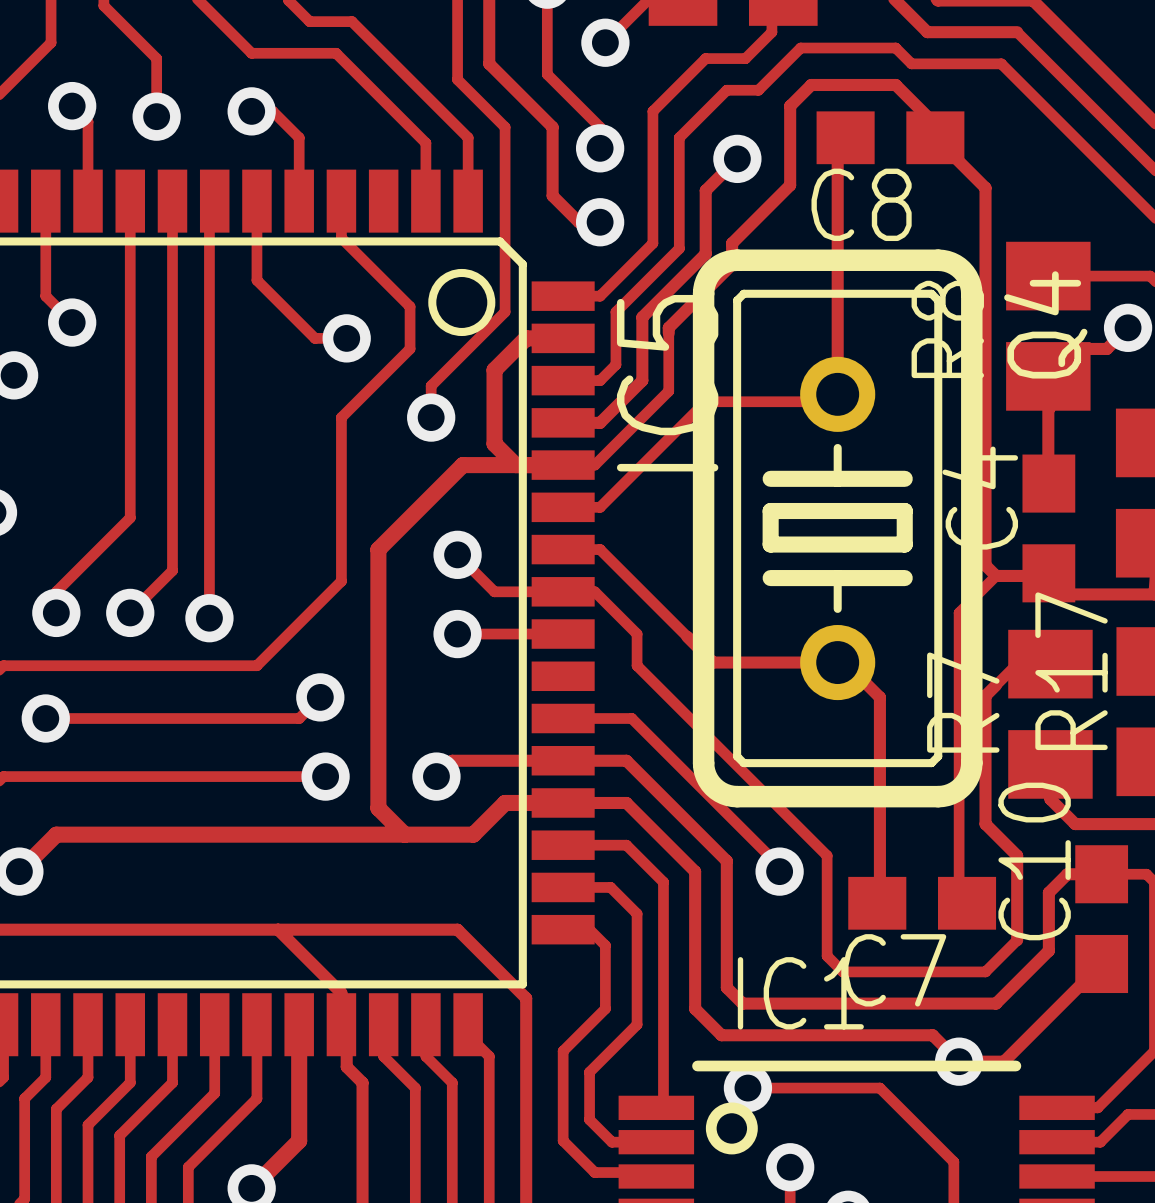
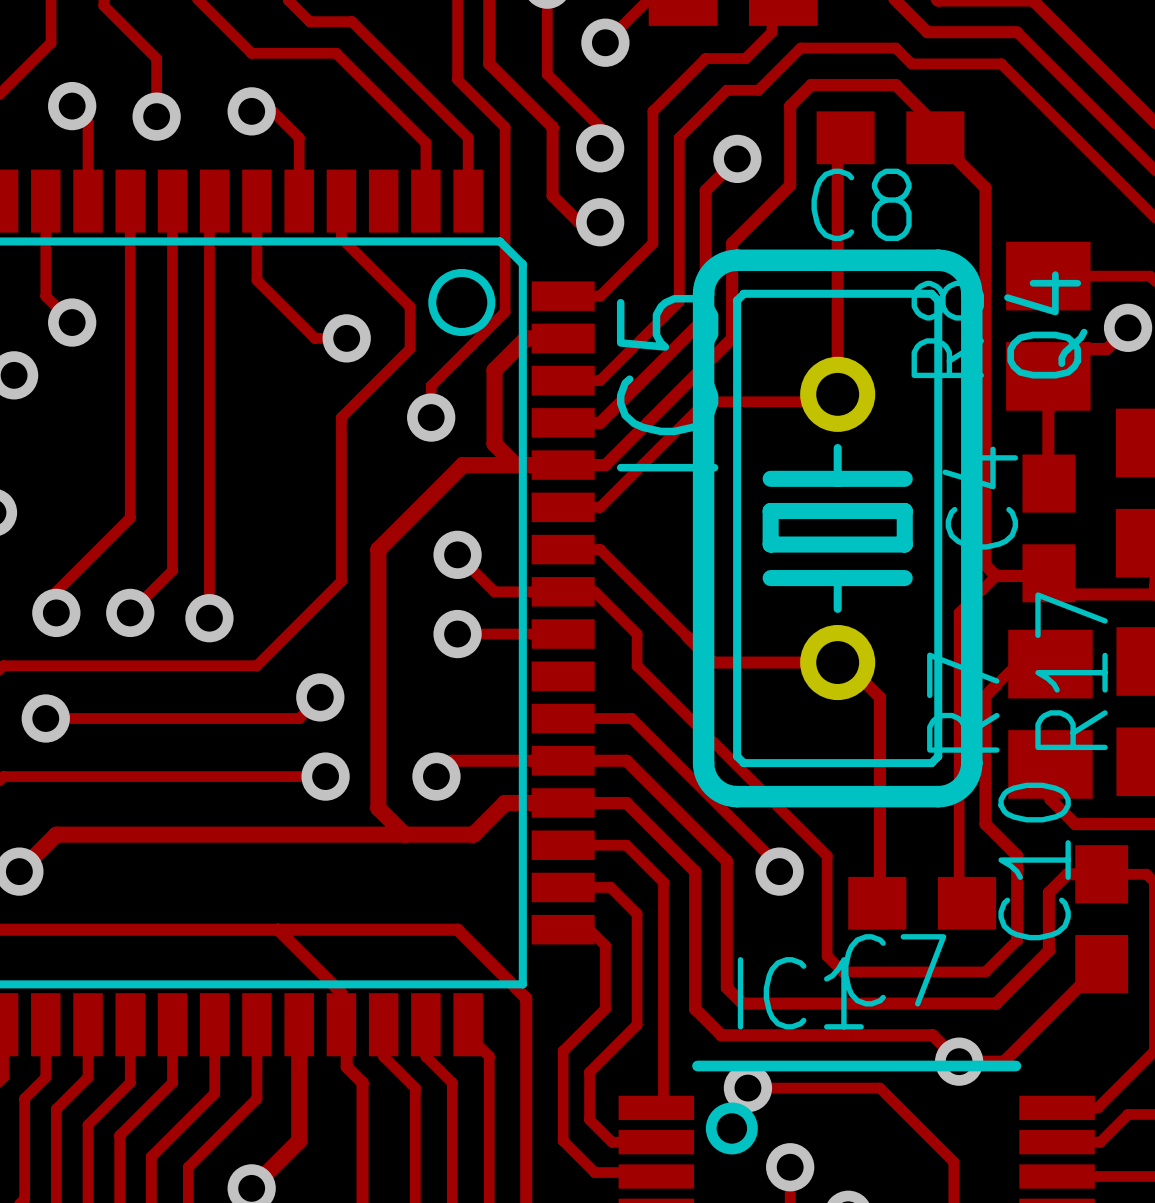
track: (679, 248) (615, 311) (615, 364) -> (679, 248) (679, 301) (615, 364)
track: (705, 253) (642, 317) (642, 380) -> (705, 253) (705, 317) (642, 380)
track: (732, 264) (668, 327) (668, 391) (594, 465) -> (732, 264) (732, 338) (605, 465) (594, 465)

